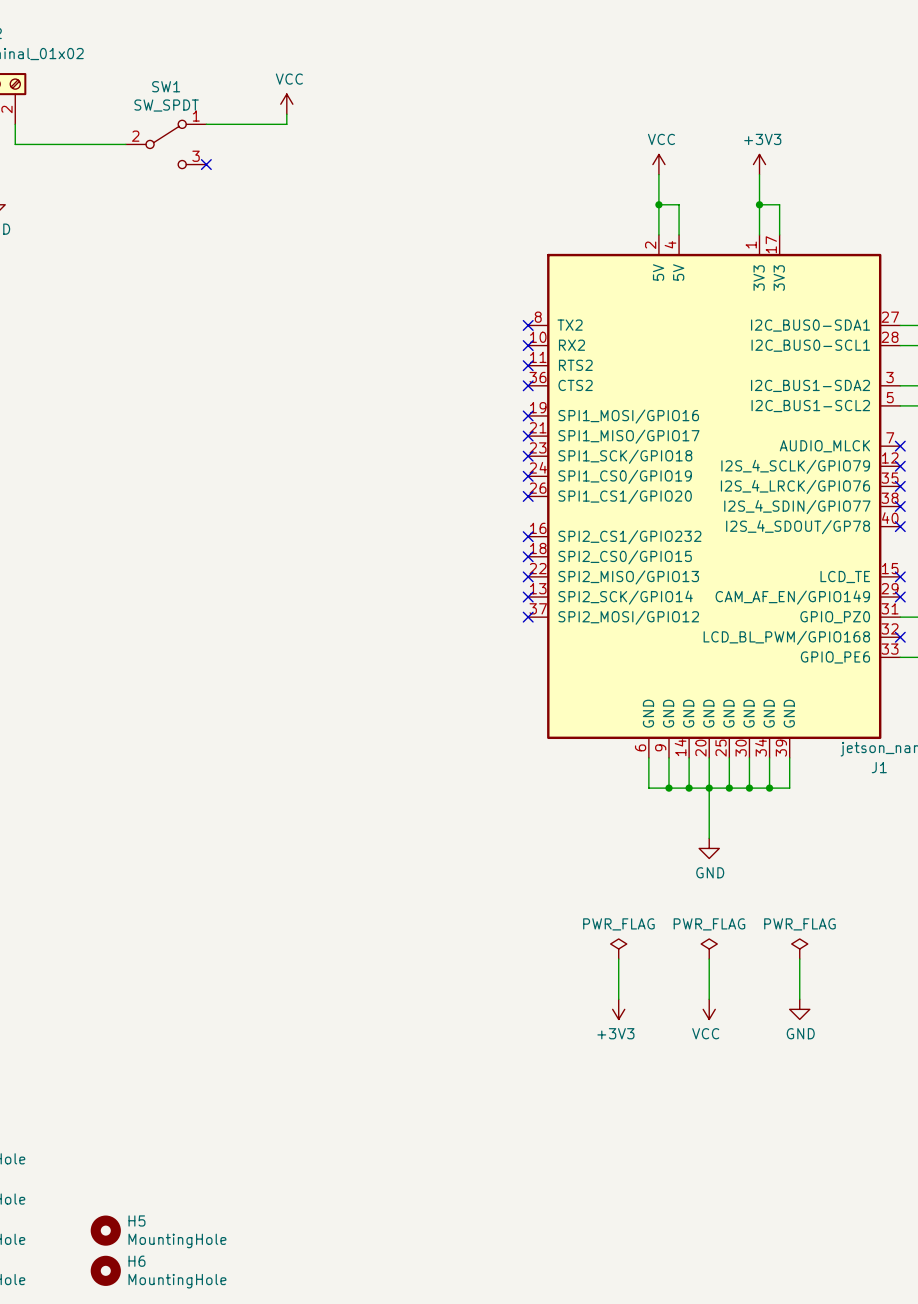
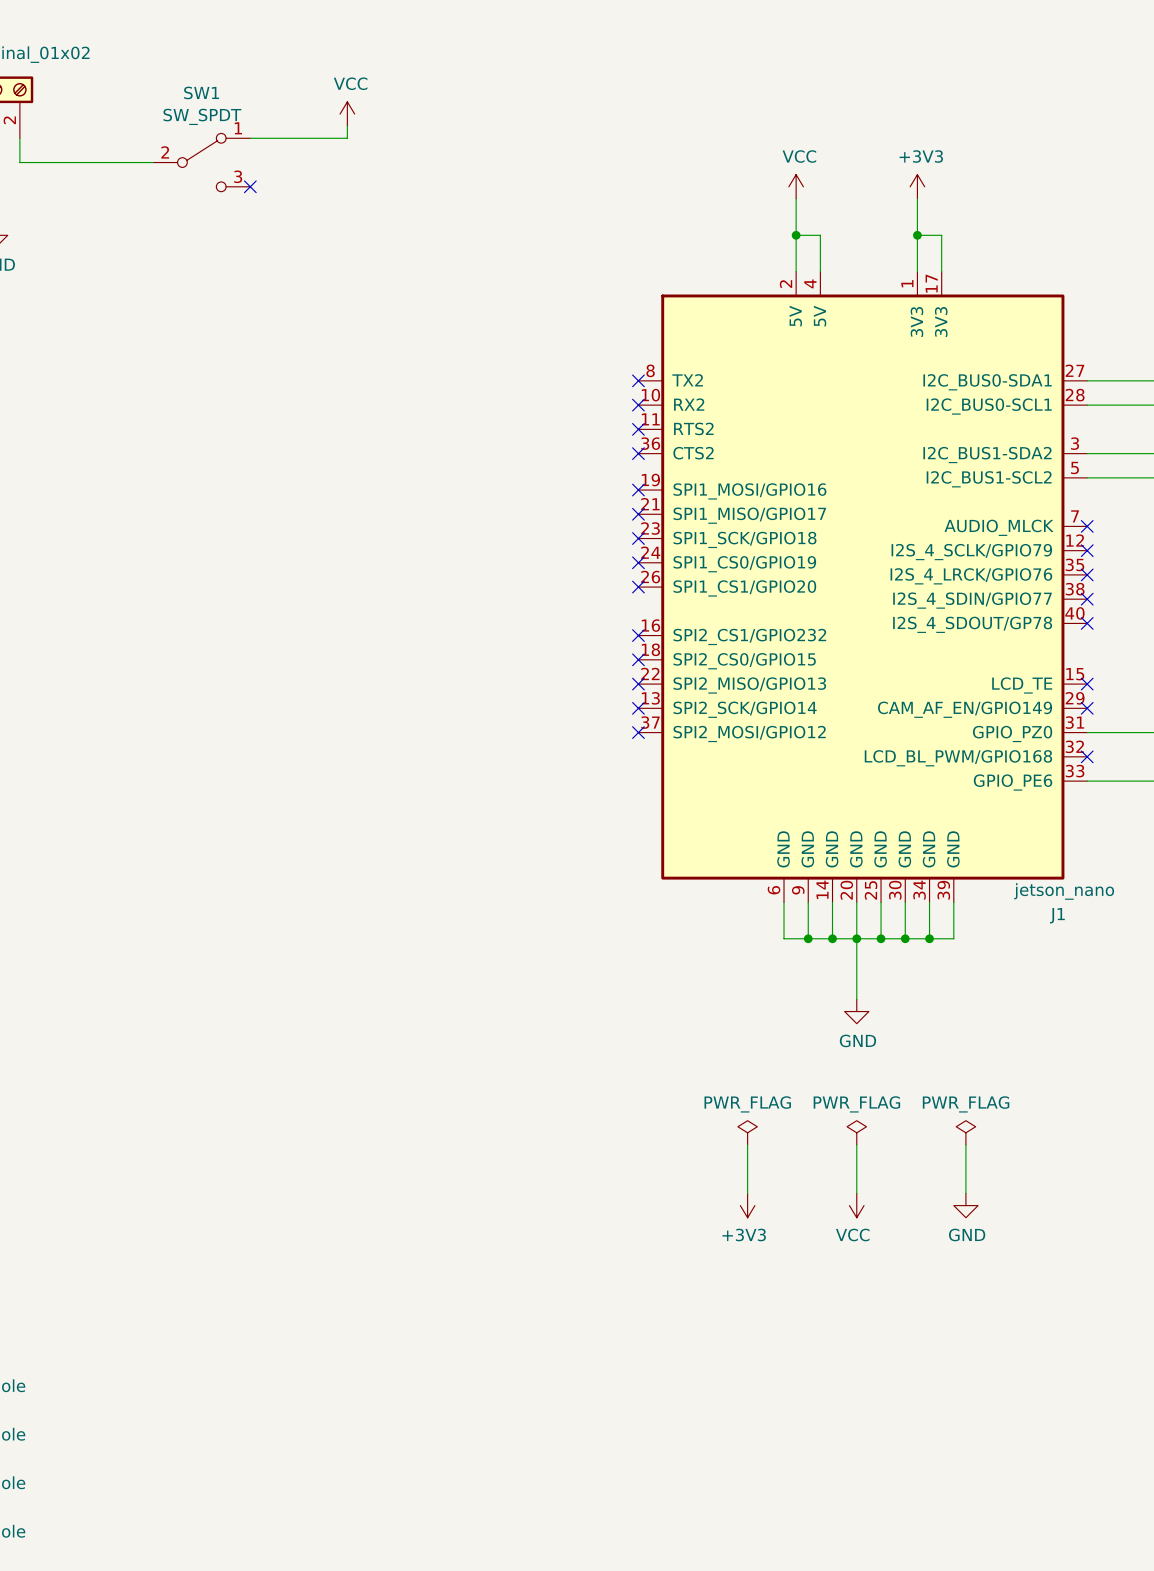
H5: MountingHole (105, 1230) -> none
H6: MountingHole (105, 1270) -> none

